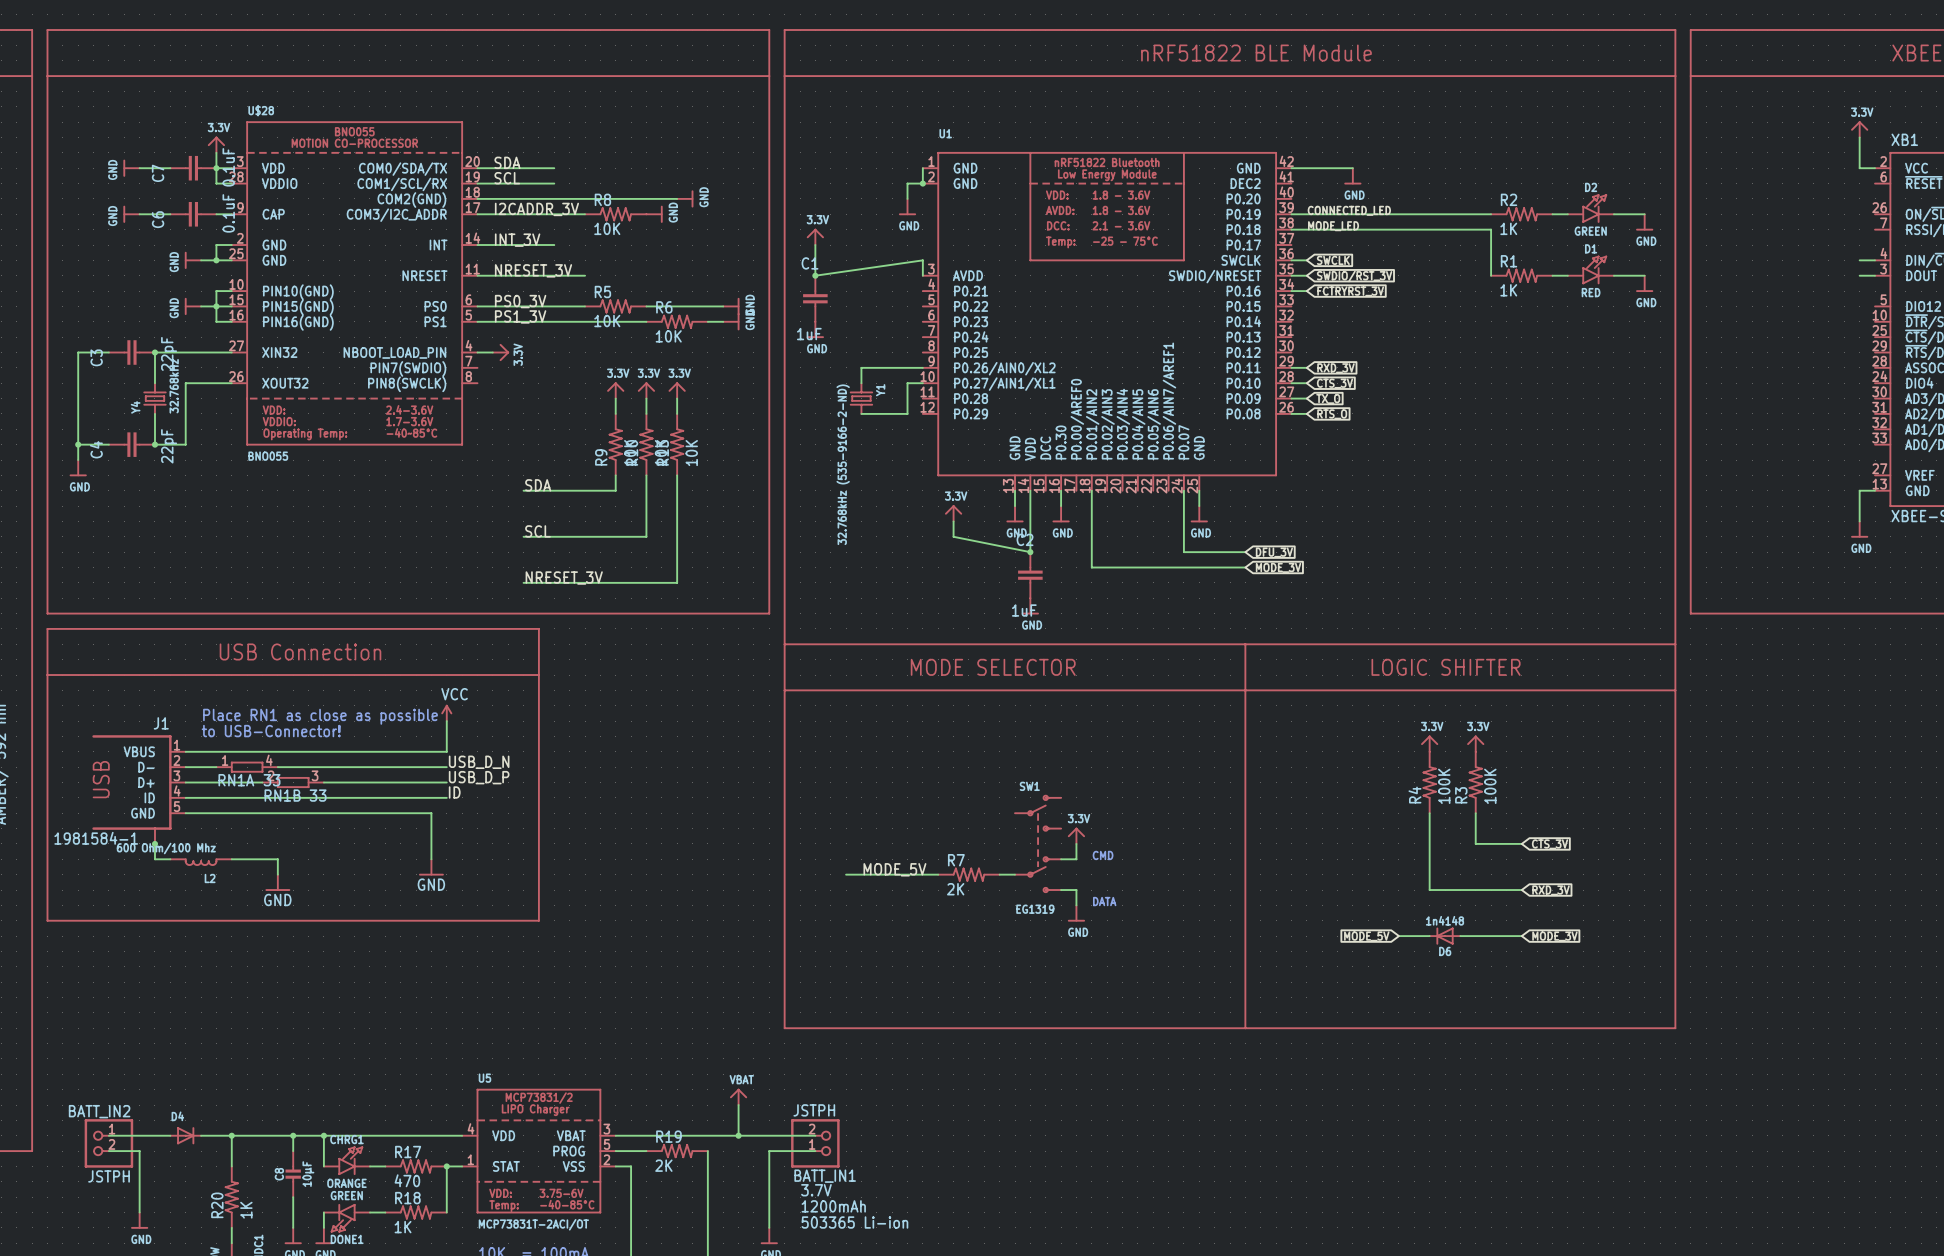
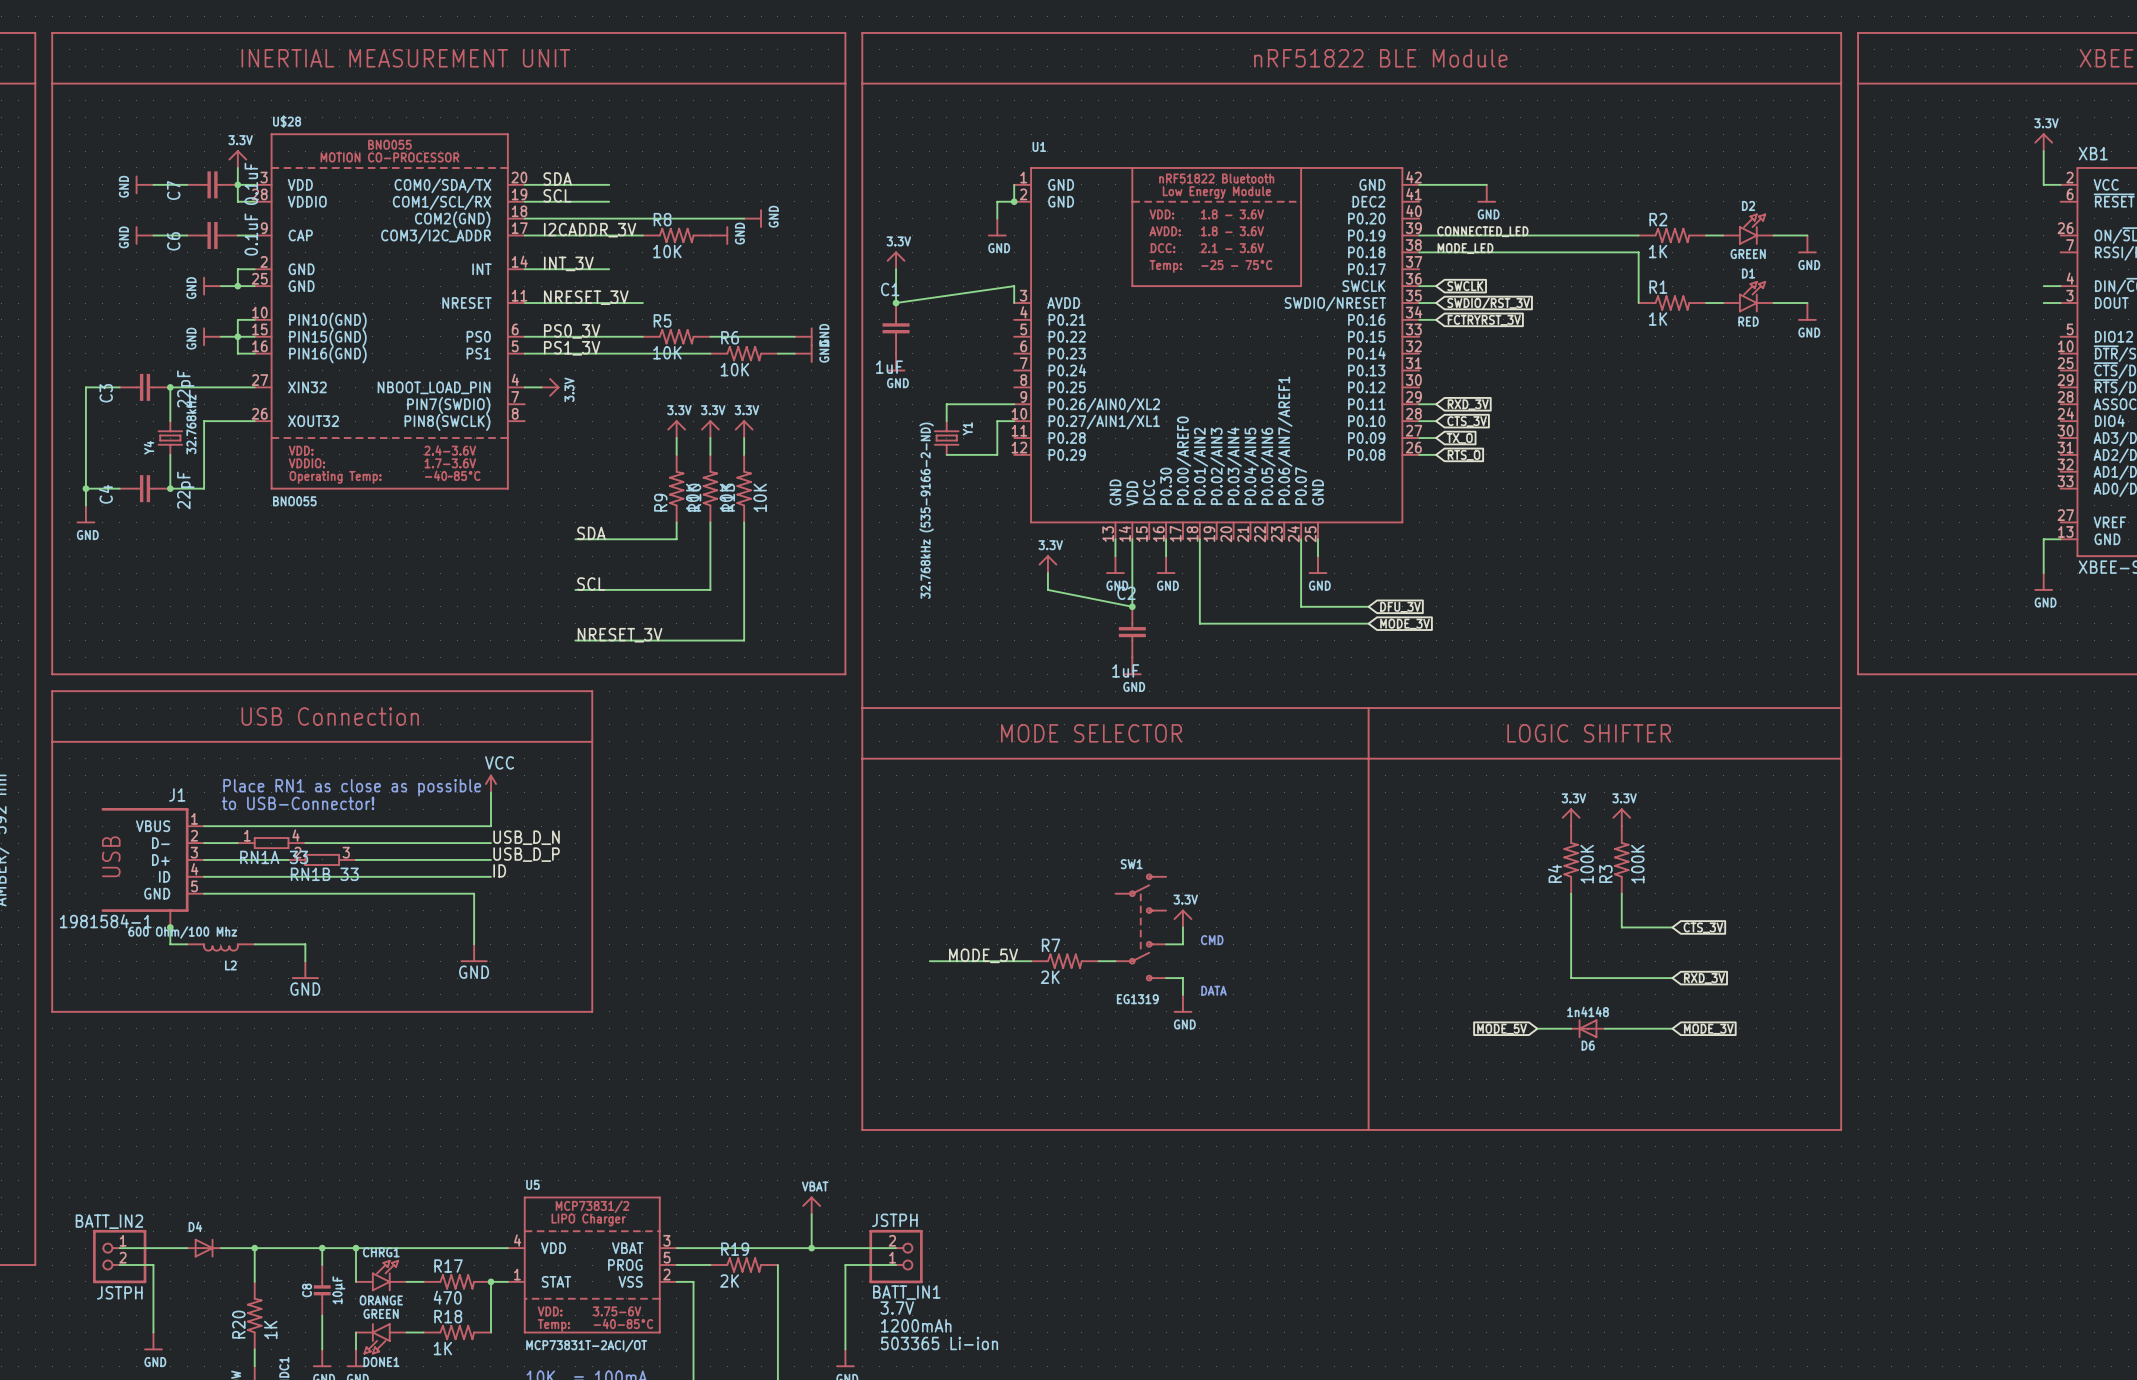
text: none -> INERTIAL MEASUREMENT UNIT (405, 58)

